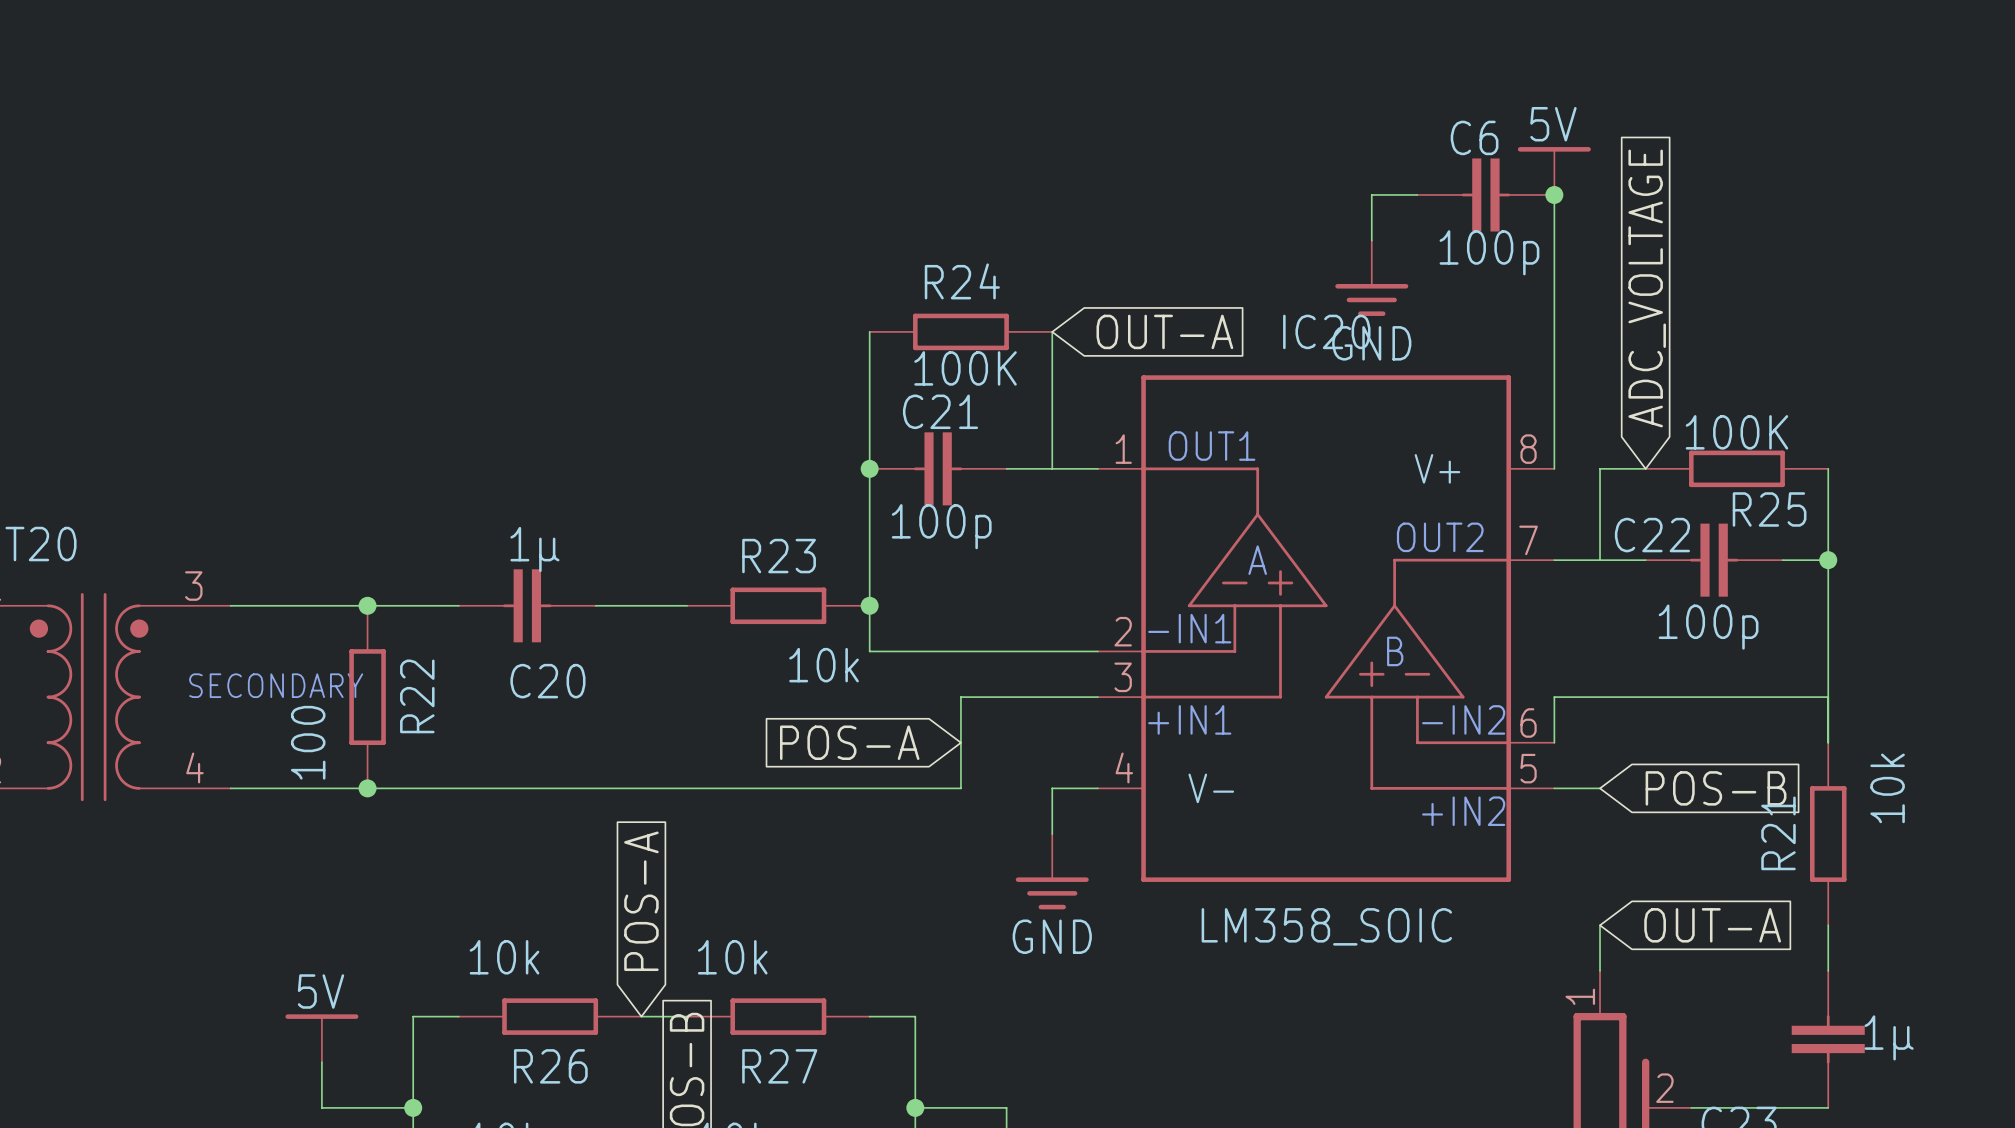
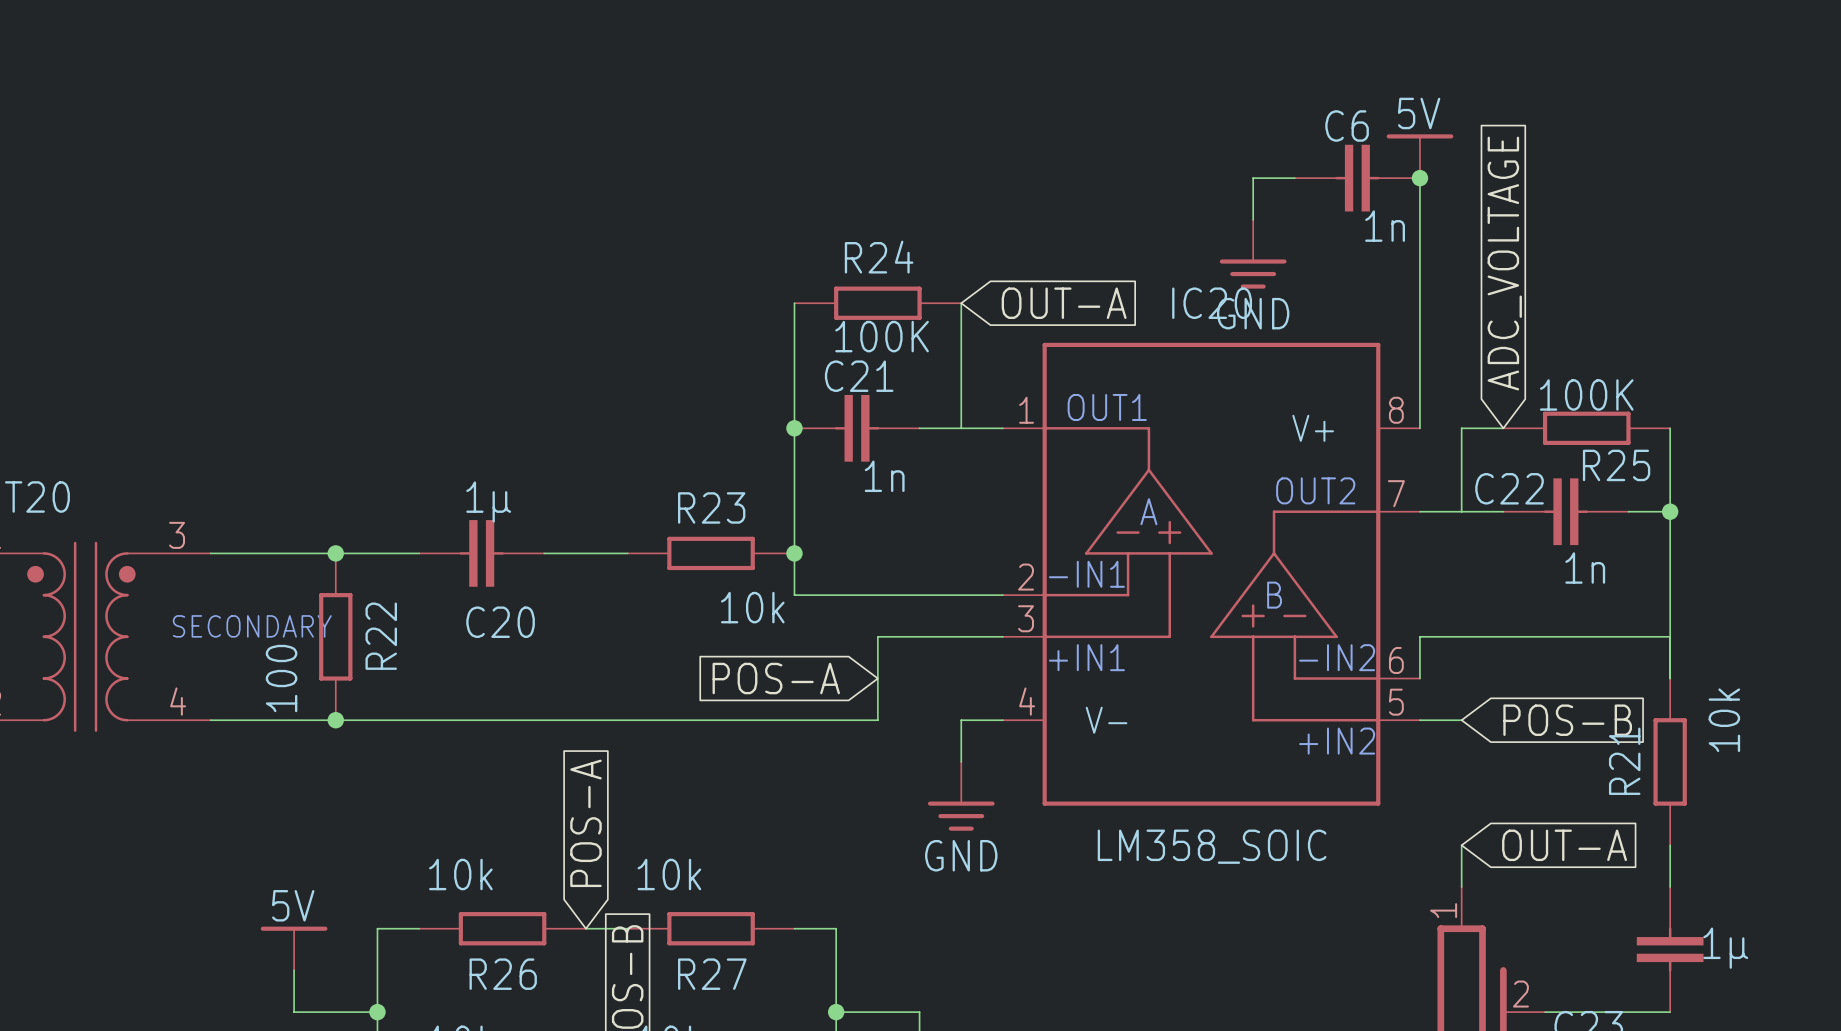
C6 value: 100p (1489, 252) -> 1n (1385, 226)
C21 value: 100p (941, 526) -> 1n (884, 476)
C22 value: 100p (1708, 627) -> 1n (1585, 568)

